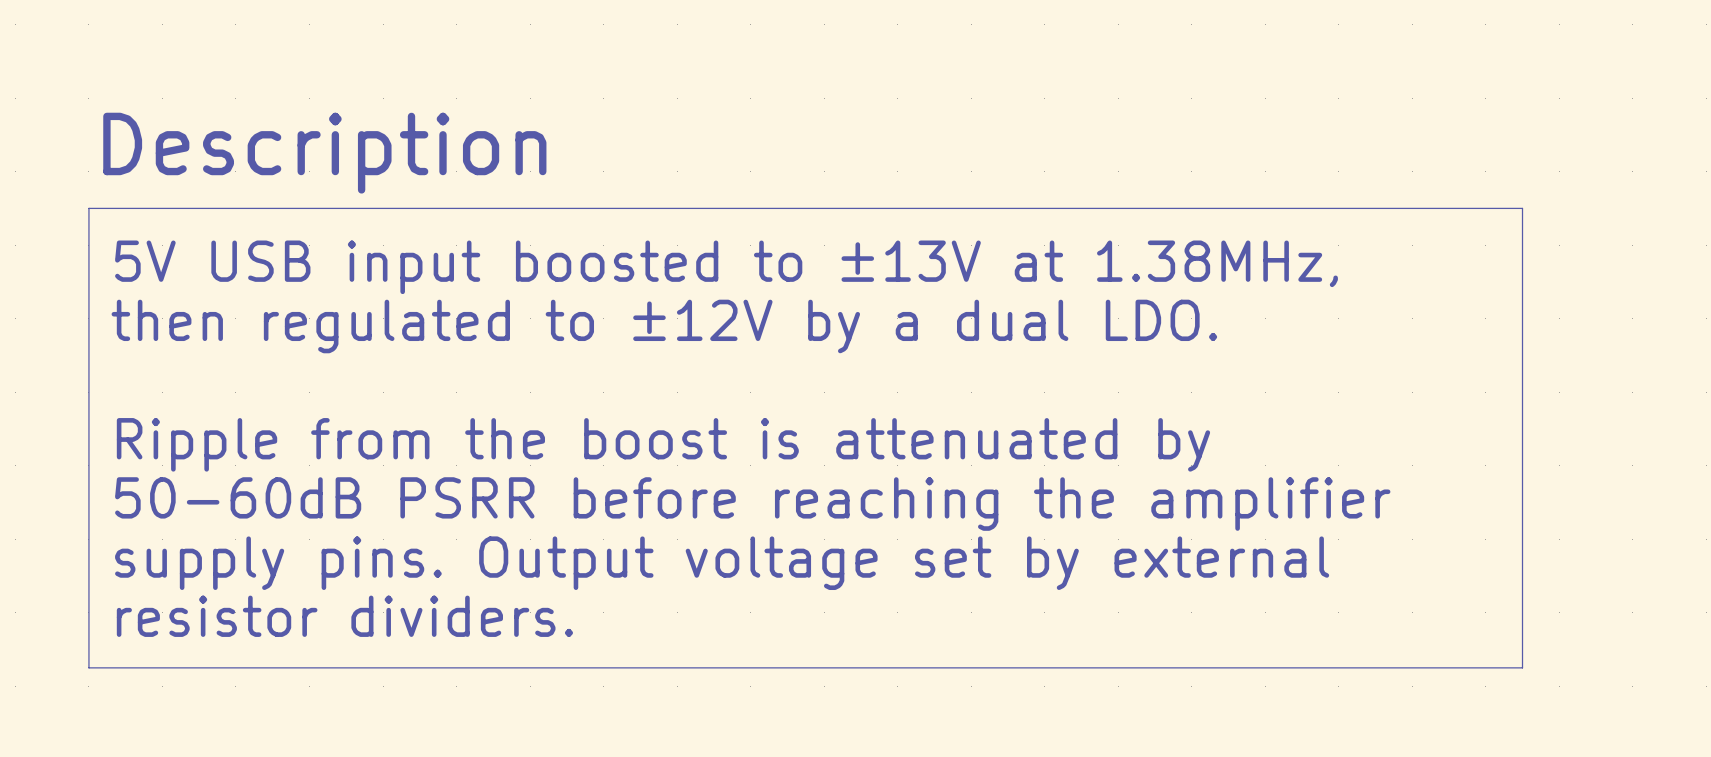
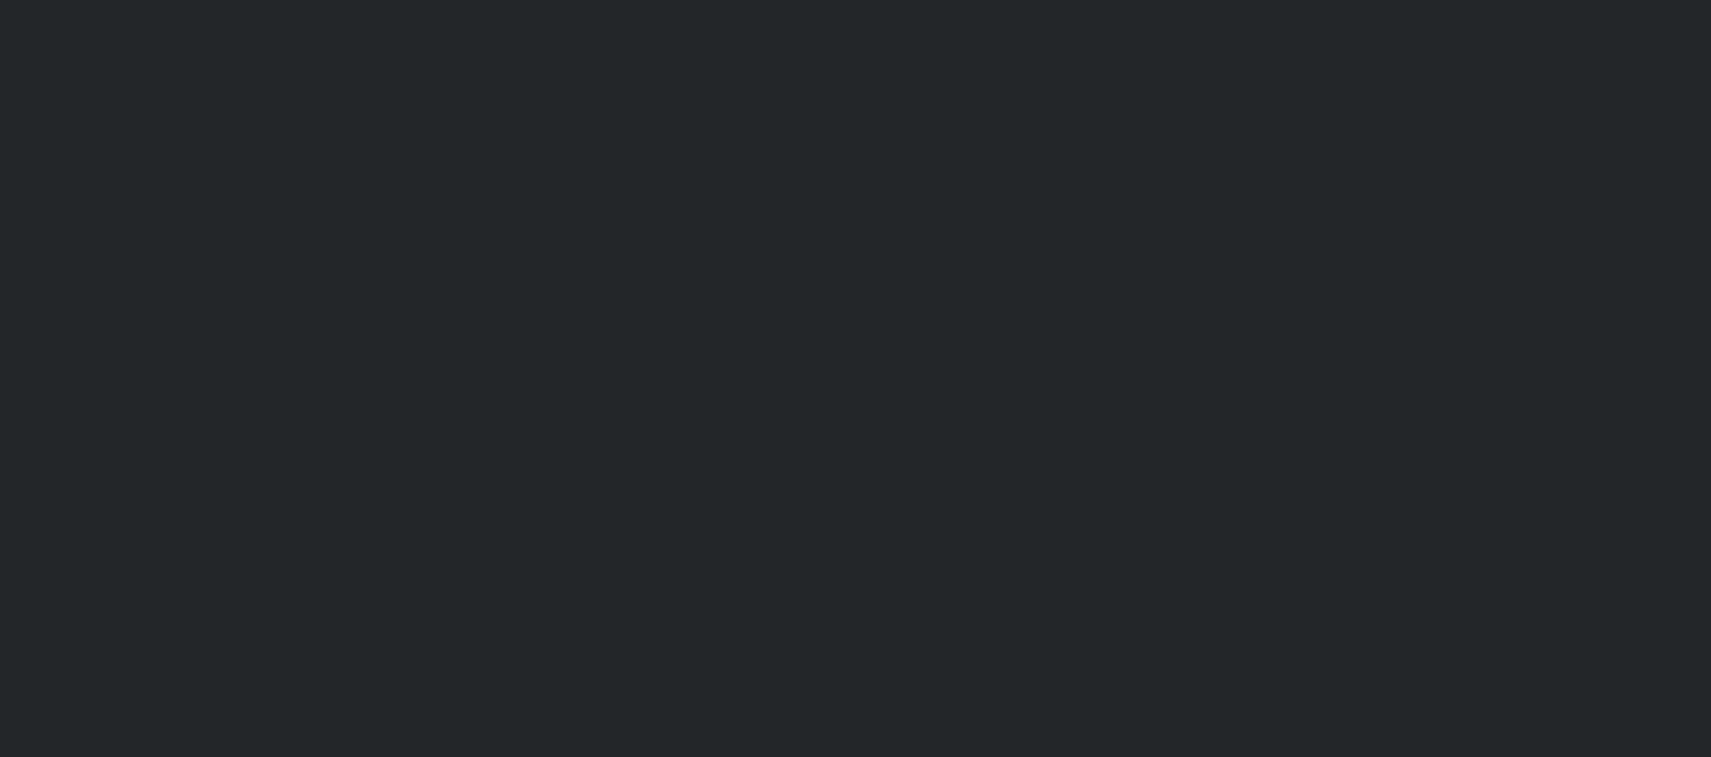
text: Description (324, 153) -> none
line: (88, 208) (1522, 208) (1522, 667) (88, 667) (88, 208) -> none
text: 5V USB input boosted to ±13V at 1.38MHz, (726, 267) -> none
text: then regulated to ±12V by a dual LDO. (664, 326) -> none
text: Ripple from the boost is attenuated by (663, 444) -> none
text: 50-60dB PSRR before reaching the amplifier (752, 504) -> none
text: supply pins. Output voltage set by external (722, 563) -> none
text: resistor dividers. (344, 616) -> none

